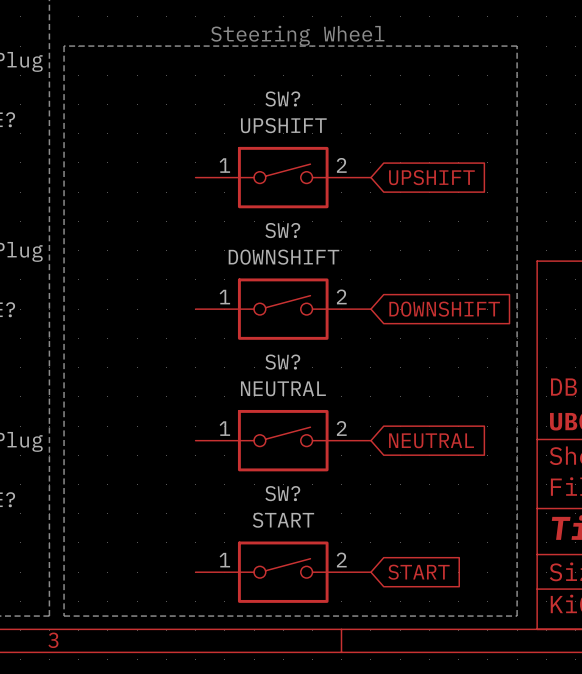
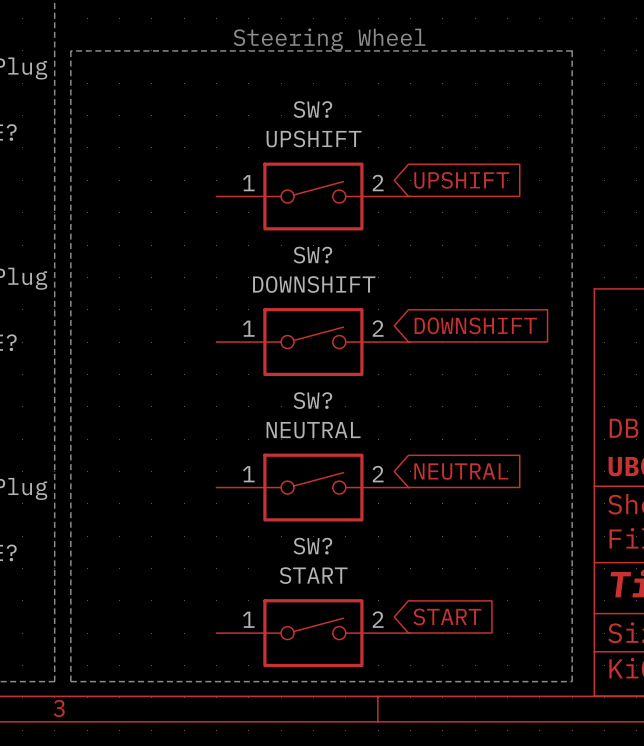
global label position: UPSHIFT (431, 177) -> UPSHIFT (461, 180)
global label position: DOWNSHIFT (444, 309) -> DOWNSHIFT (475, 325)
global label position: NEUTRAL (431, 440) -> NEUTRAL (461, 471)
global label position: START (419, 572) -> START (447, 616)

